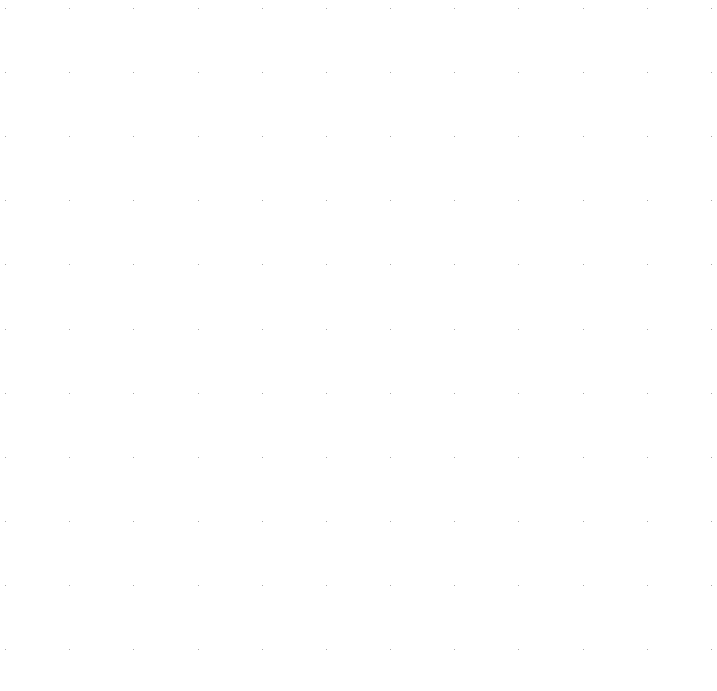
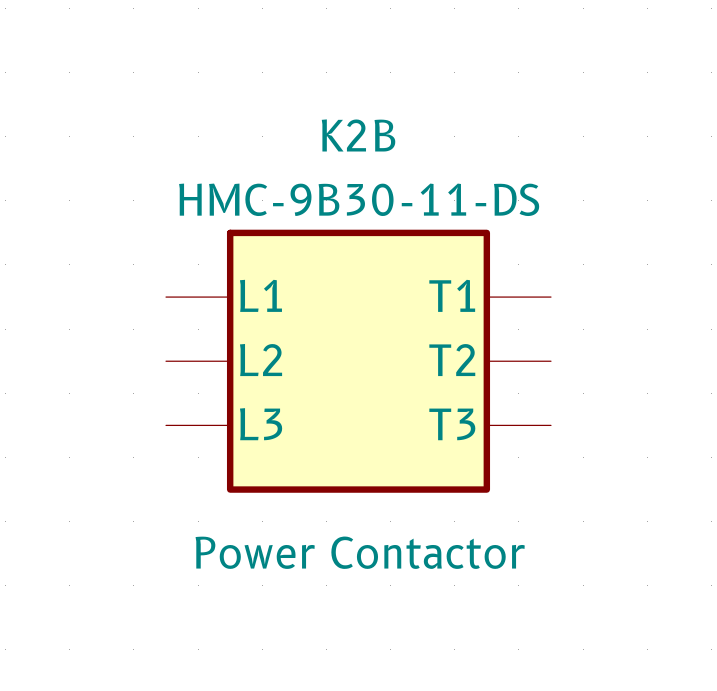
K2B: none -> HMC-9B30-11-DS (358, 361)

